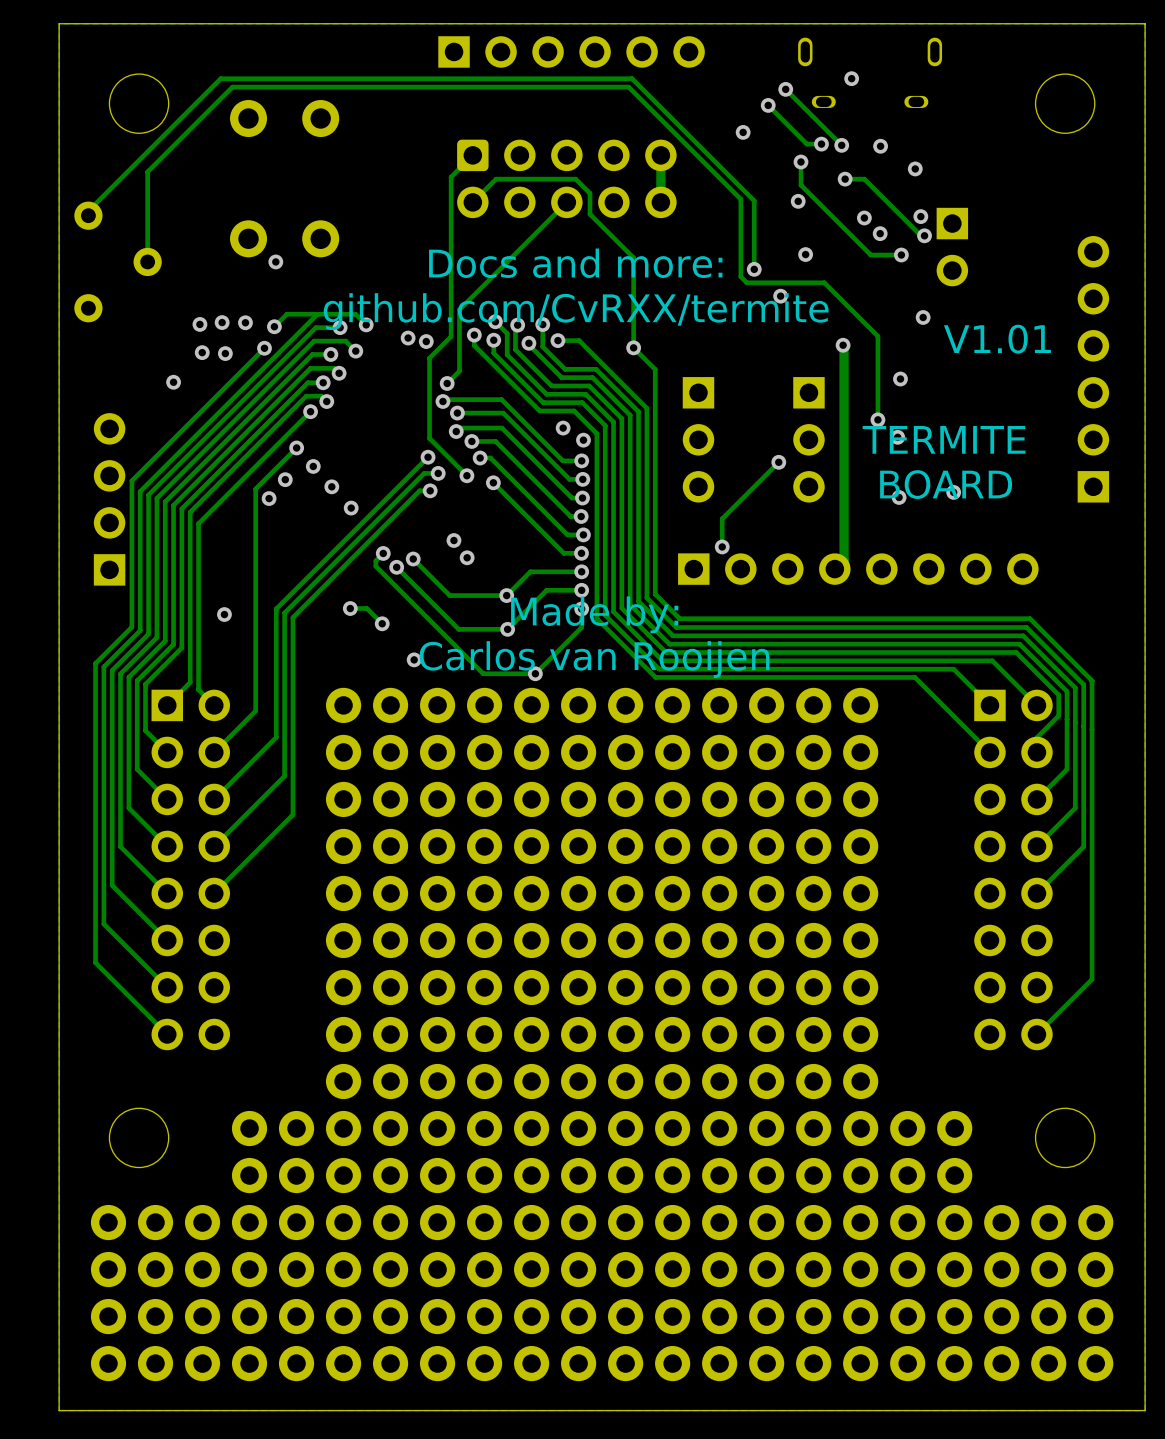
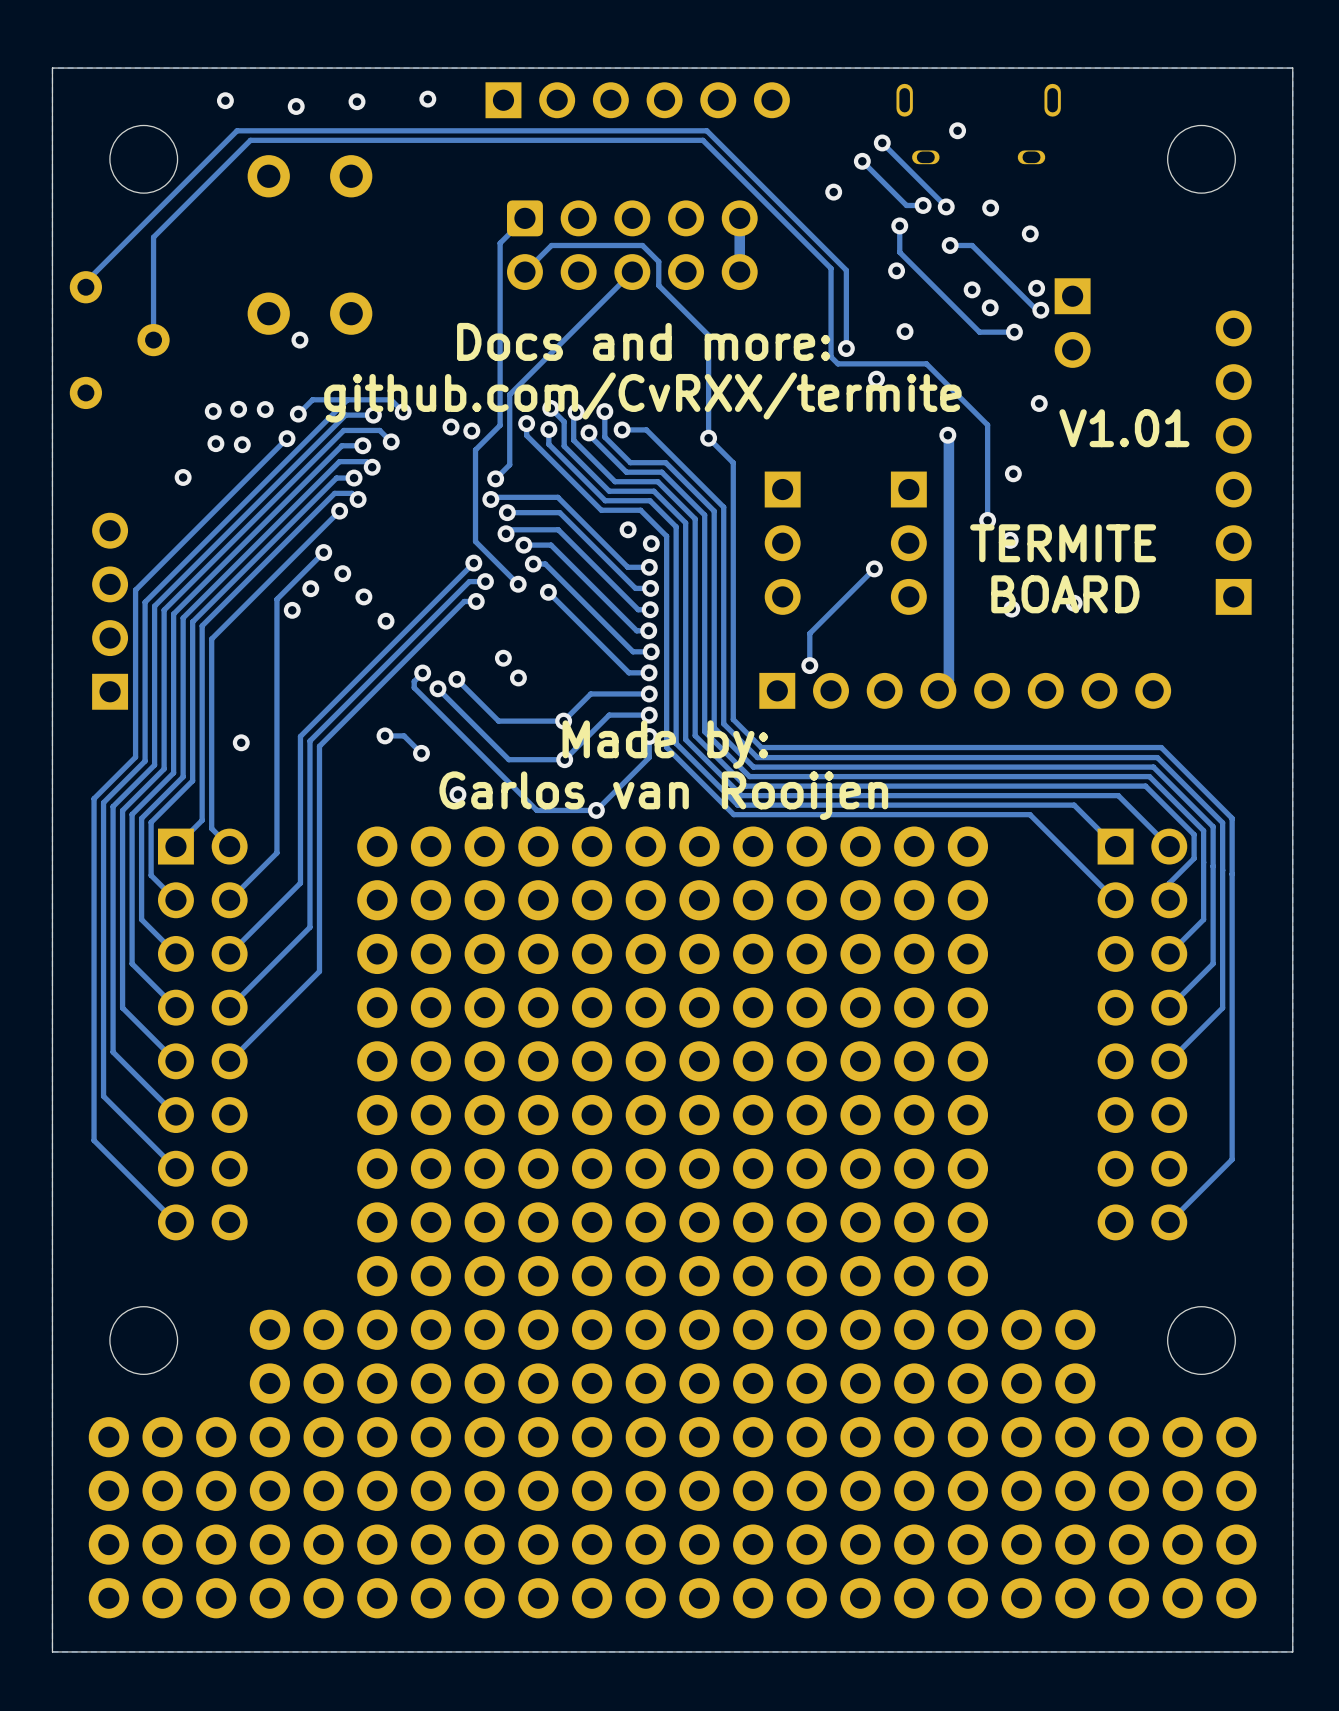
via: none -> (427, 99)
via: none -> (225, 100)
via: none -> (357, 101)
via: none -> (296, 106)

